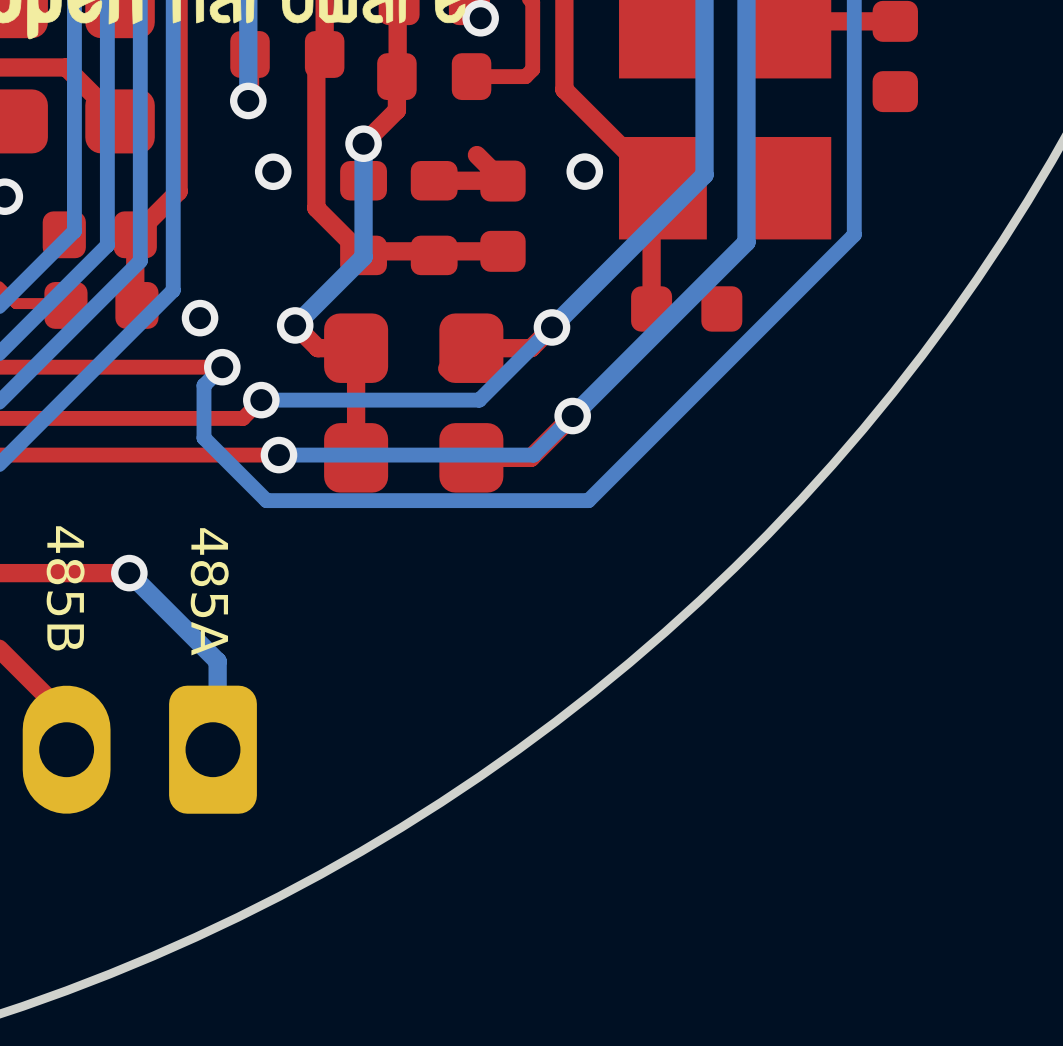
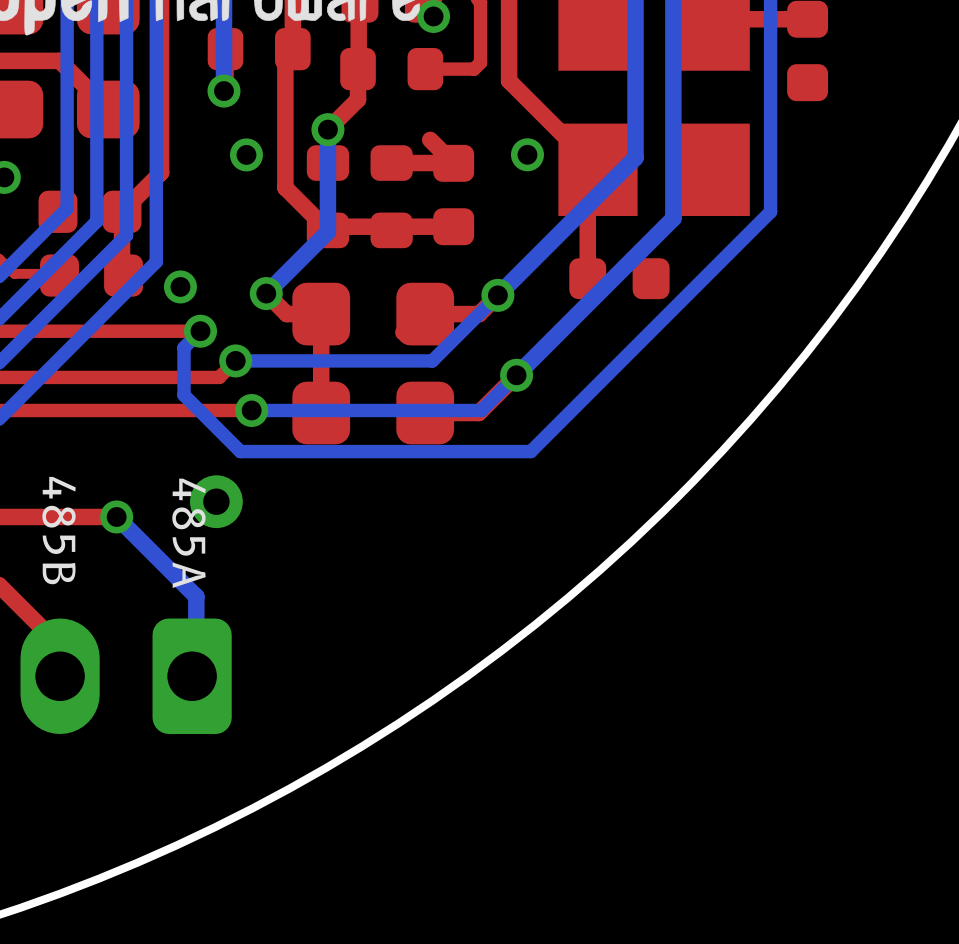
via: none -> (216, 501)

